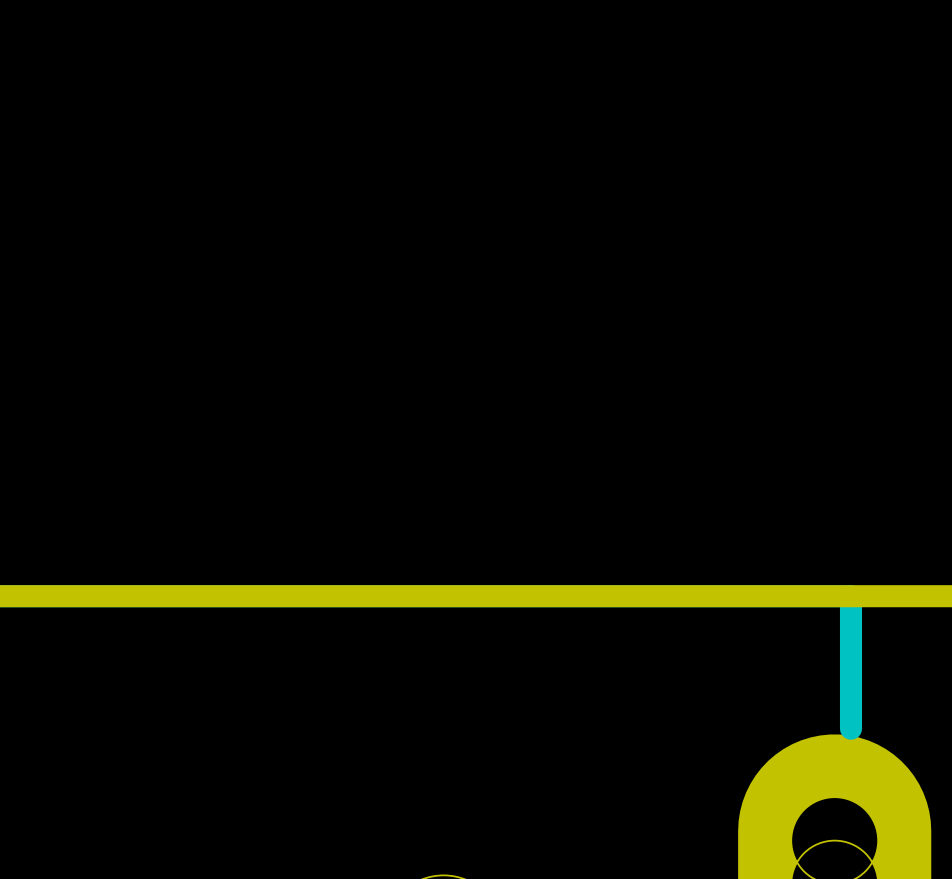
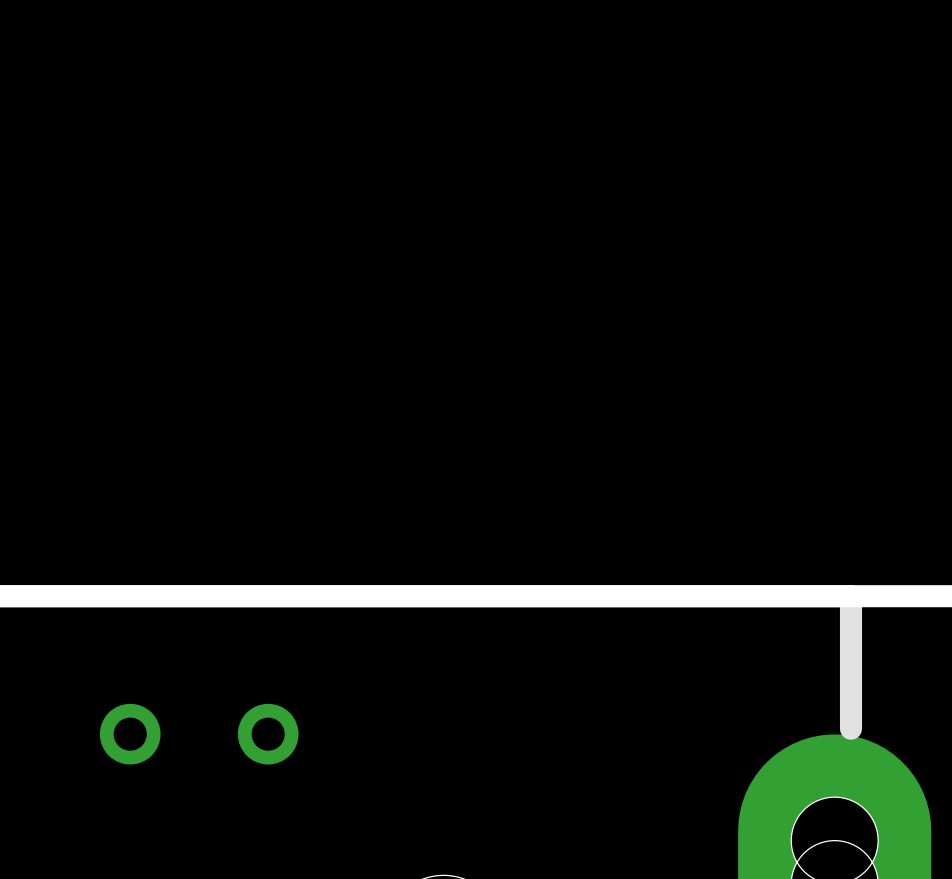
via: none -> (130, 734)
via: none -> (268, 734)

